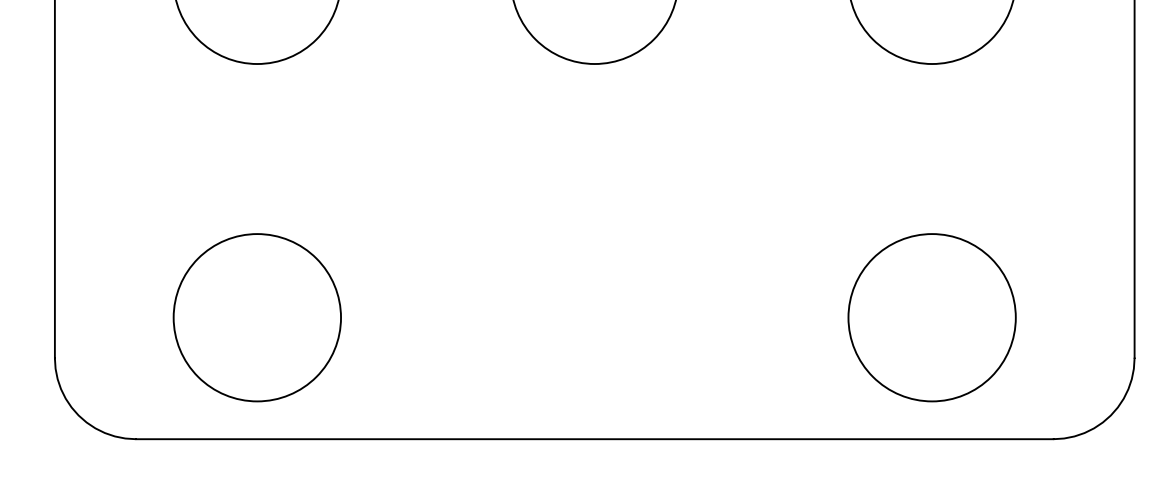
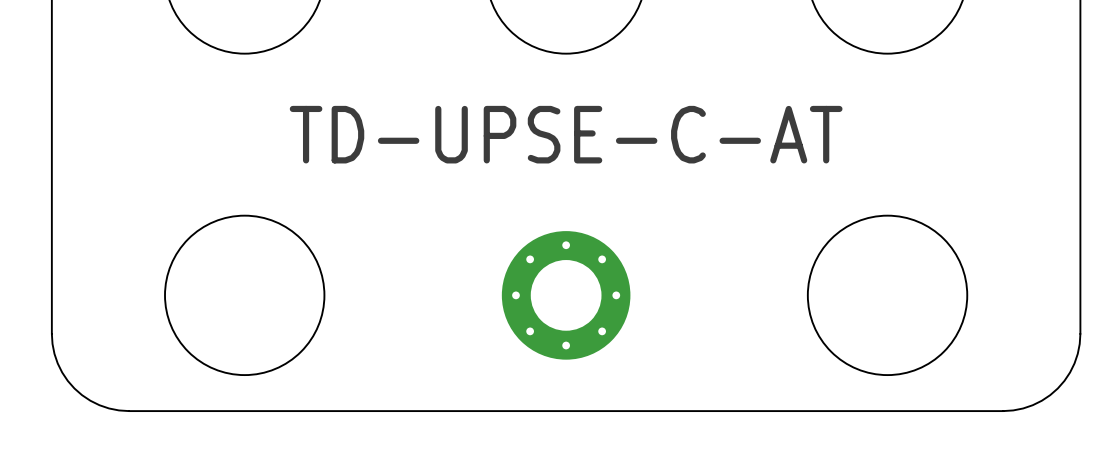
text: none -> TD-UPSE-C-AT (566, 134)
part: none -> (566, 295)

